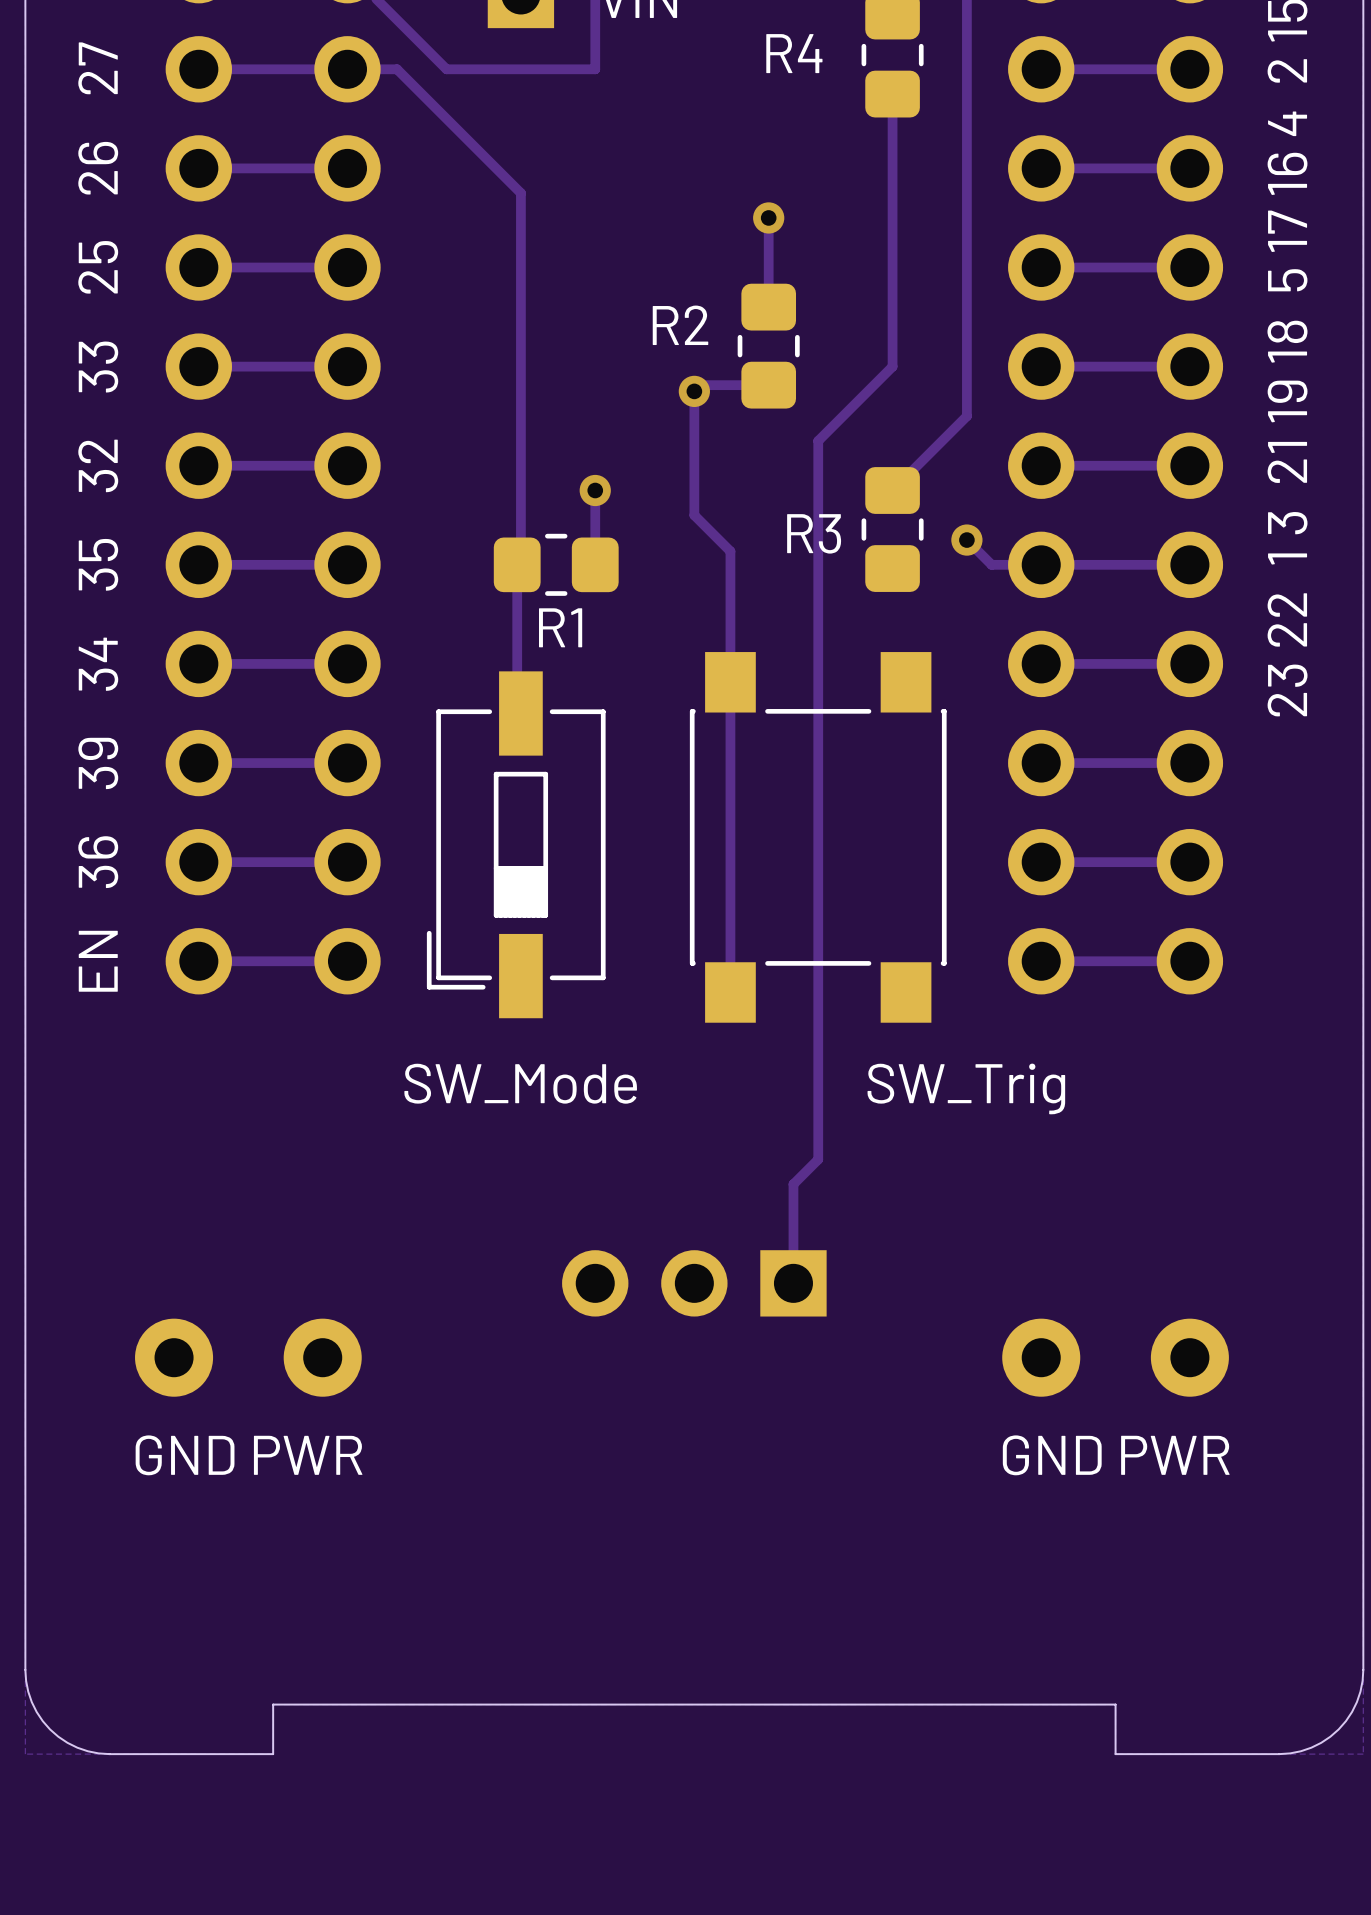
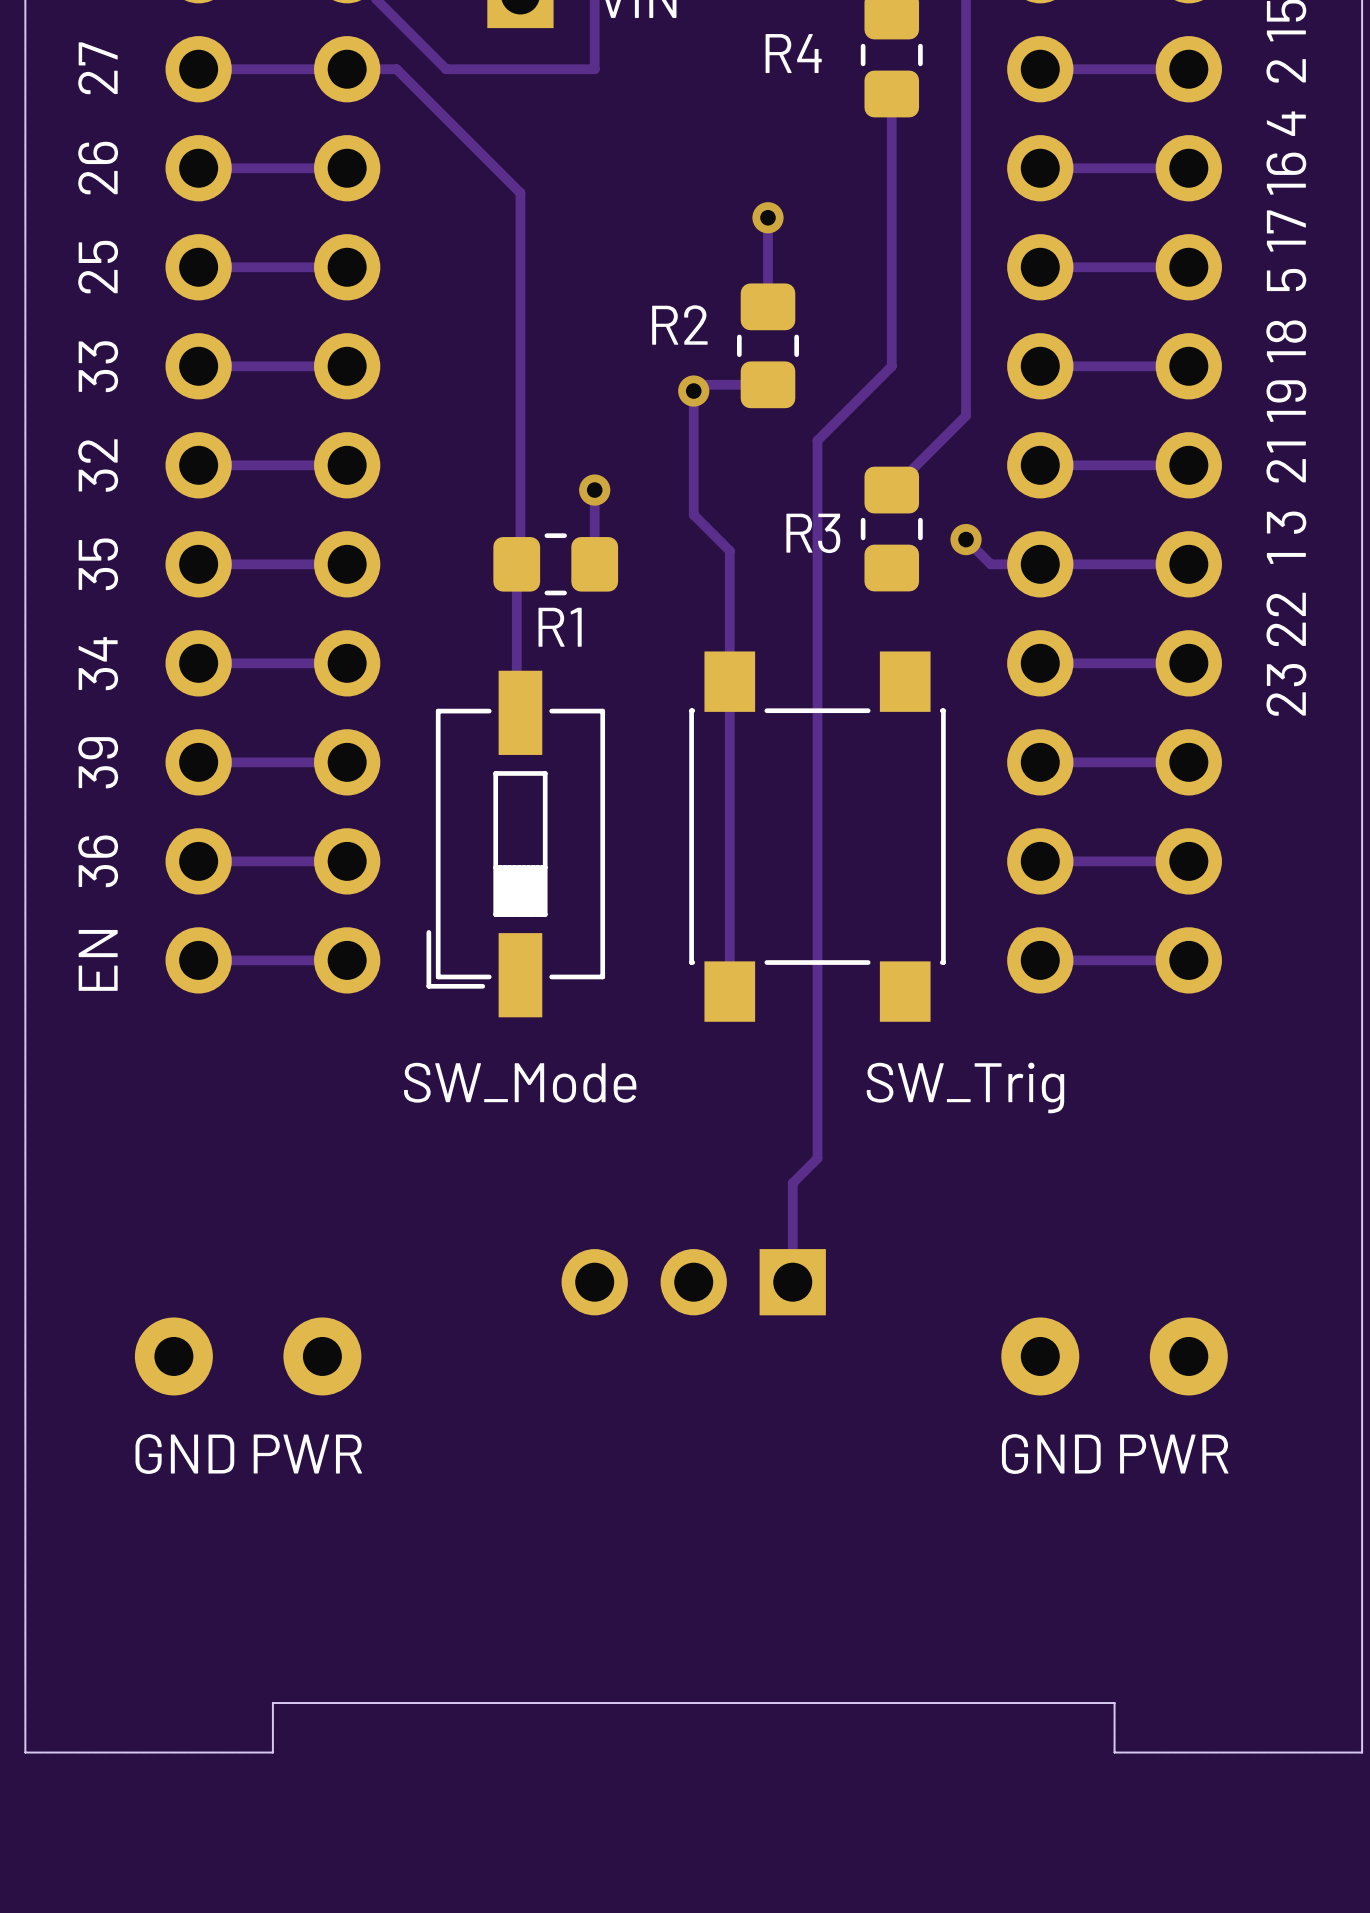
board edge: (25, 1669) (31, 1702) (50, 1729) (77, 1747) (109, 1754) -> (25, 1668) (25, 1752) (109, 1752)
board edge: (1363, 1669) (1356, 1702) (1338, 1729) (1311, 1747) (1279, 1754) -> (1362, 1668) (1362, 1752) (1277, 1752)

